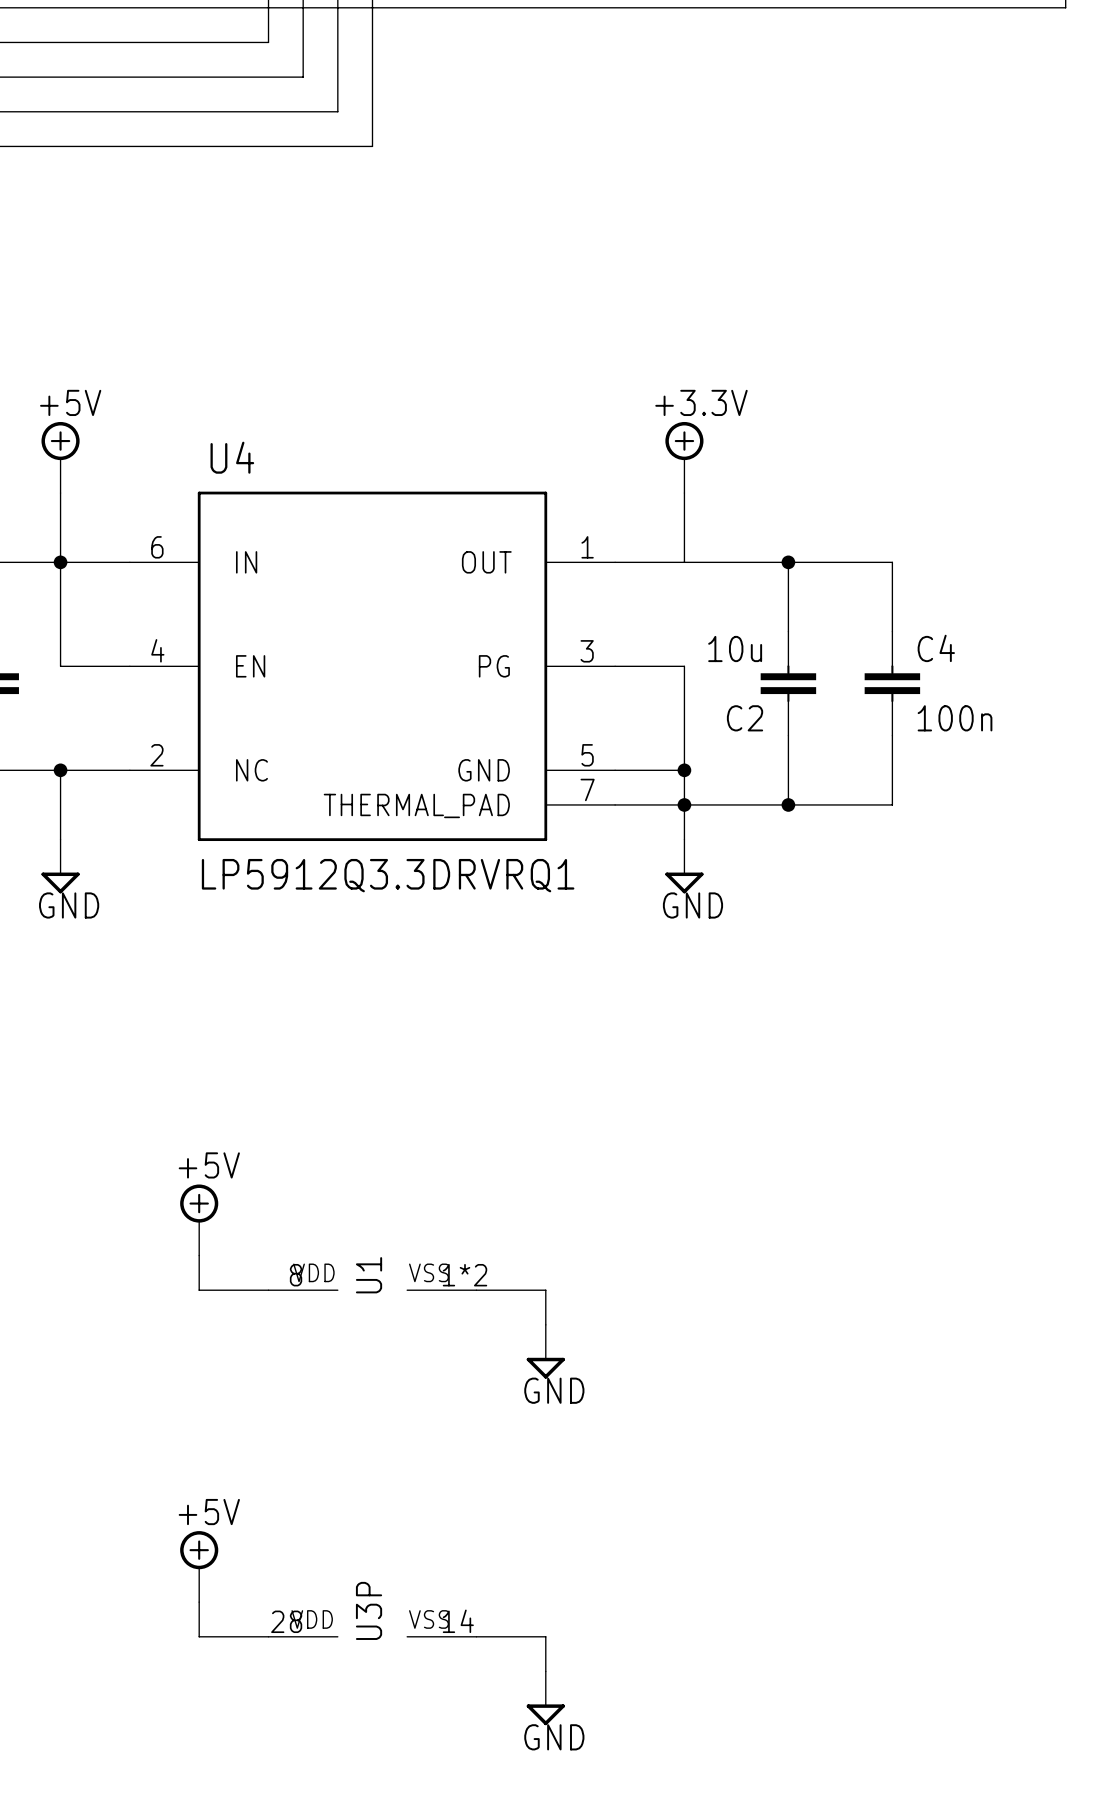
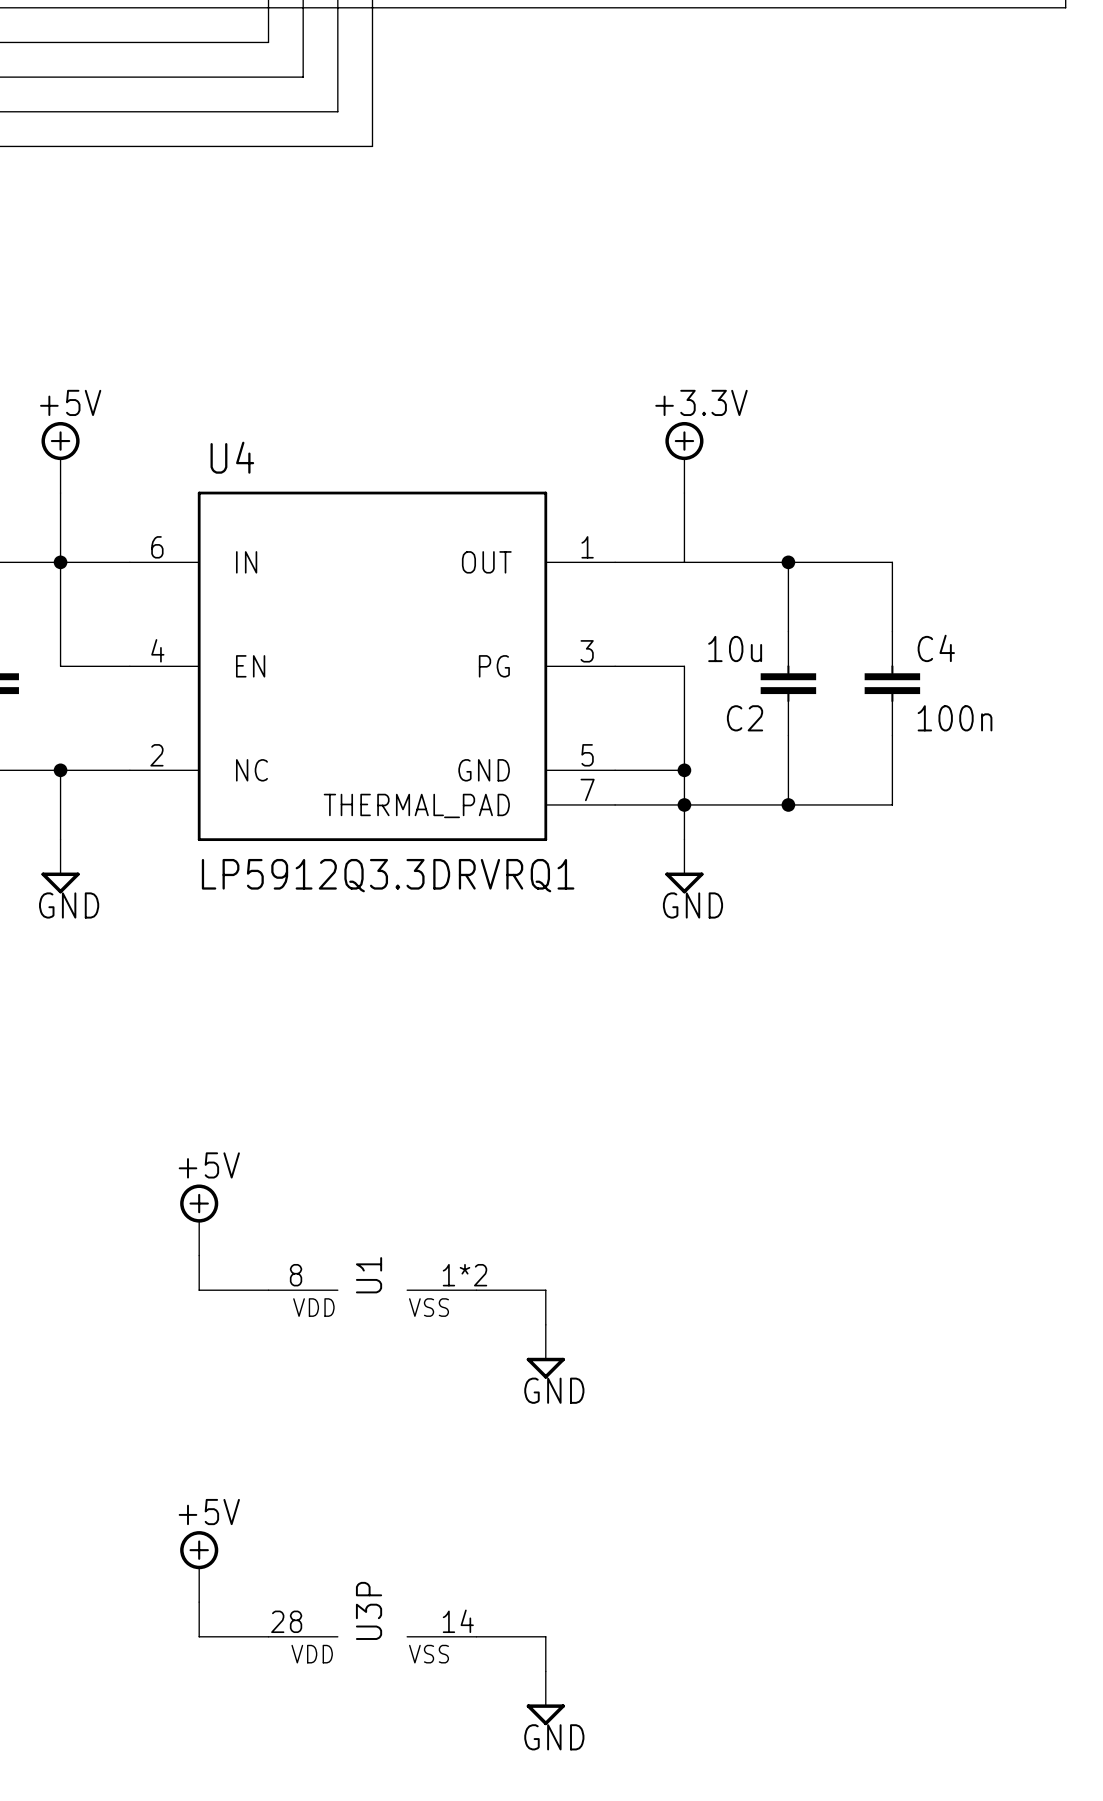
U1 text position: VDD (313, 1272) -> VDD (313, 1307)
U1 text position: VSS (429, 1272) -> VSS (429, 1307)
U3P text position: VDD (312, 1619) -> VDD (312, 1654)
U3P text position: VSS (429, 1619) -> VSS (429, 1654)

